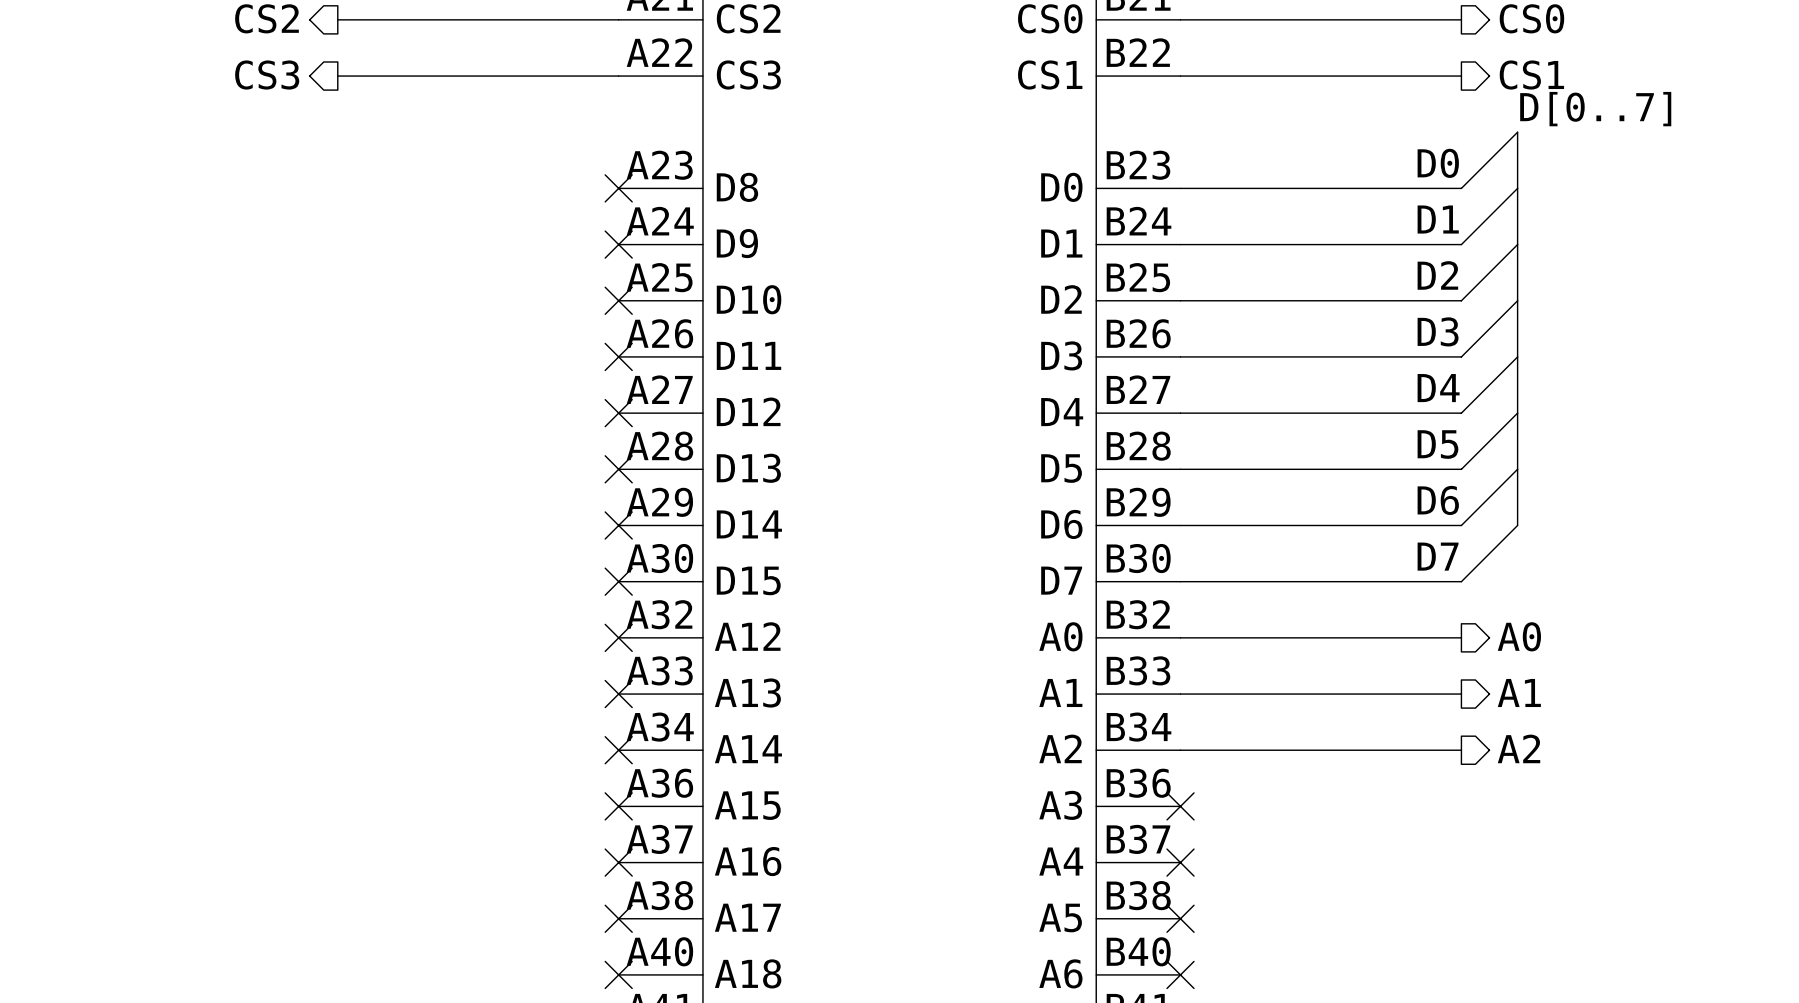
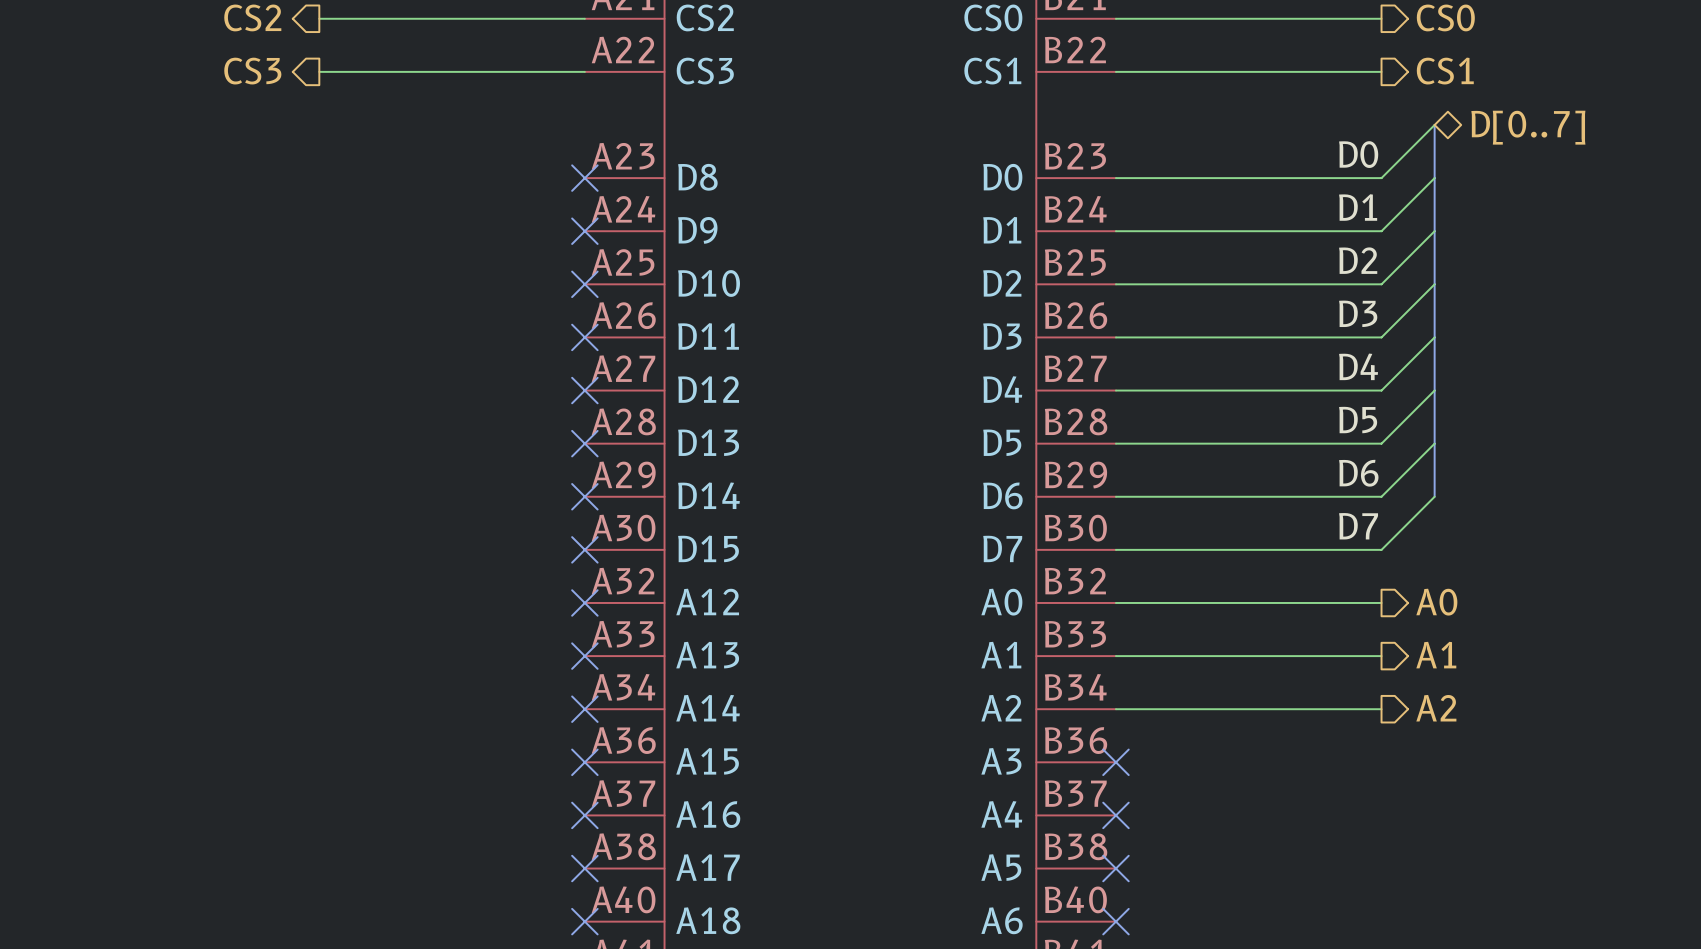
label: D[0..7] (1595, 109) -> none
hierarchical label: none -> D[0..7] (1528, 127)

